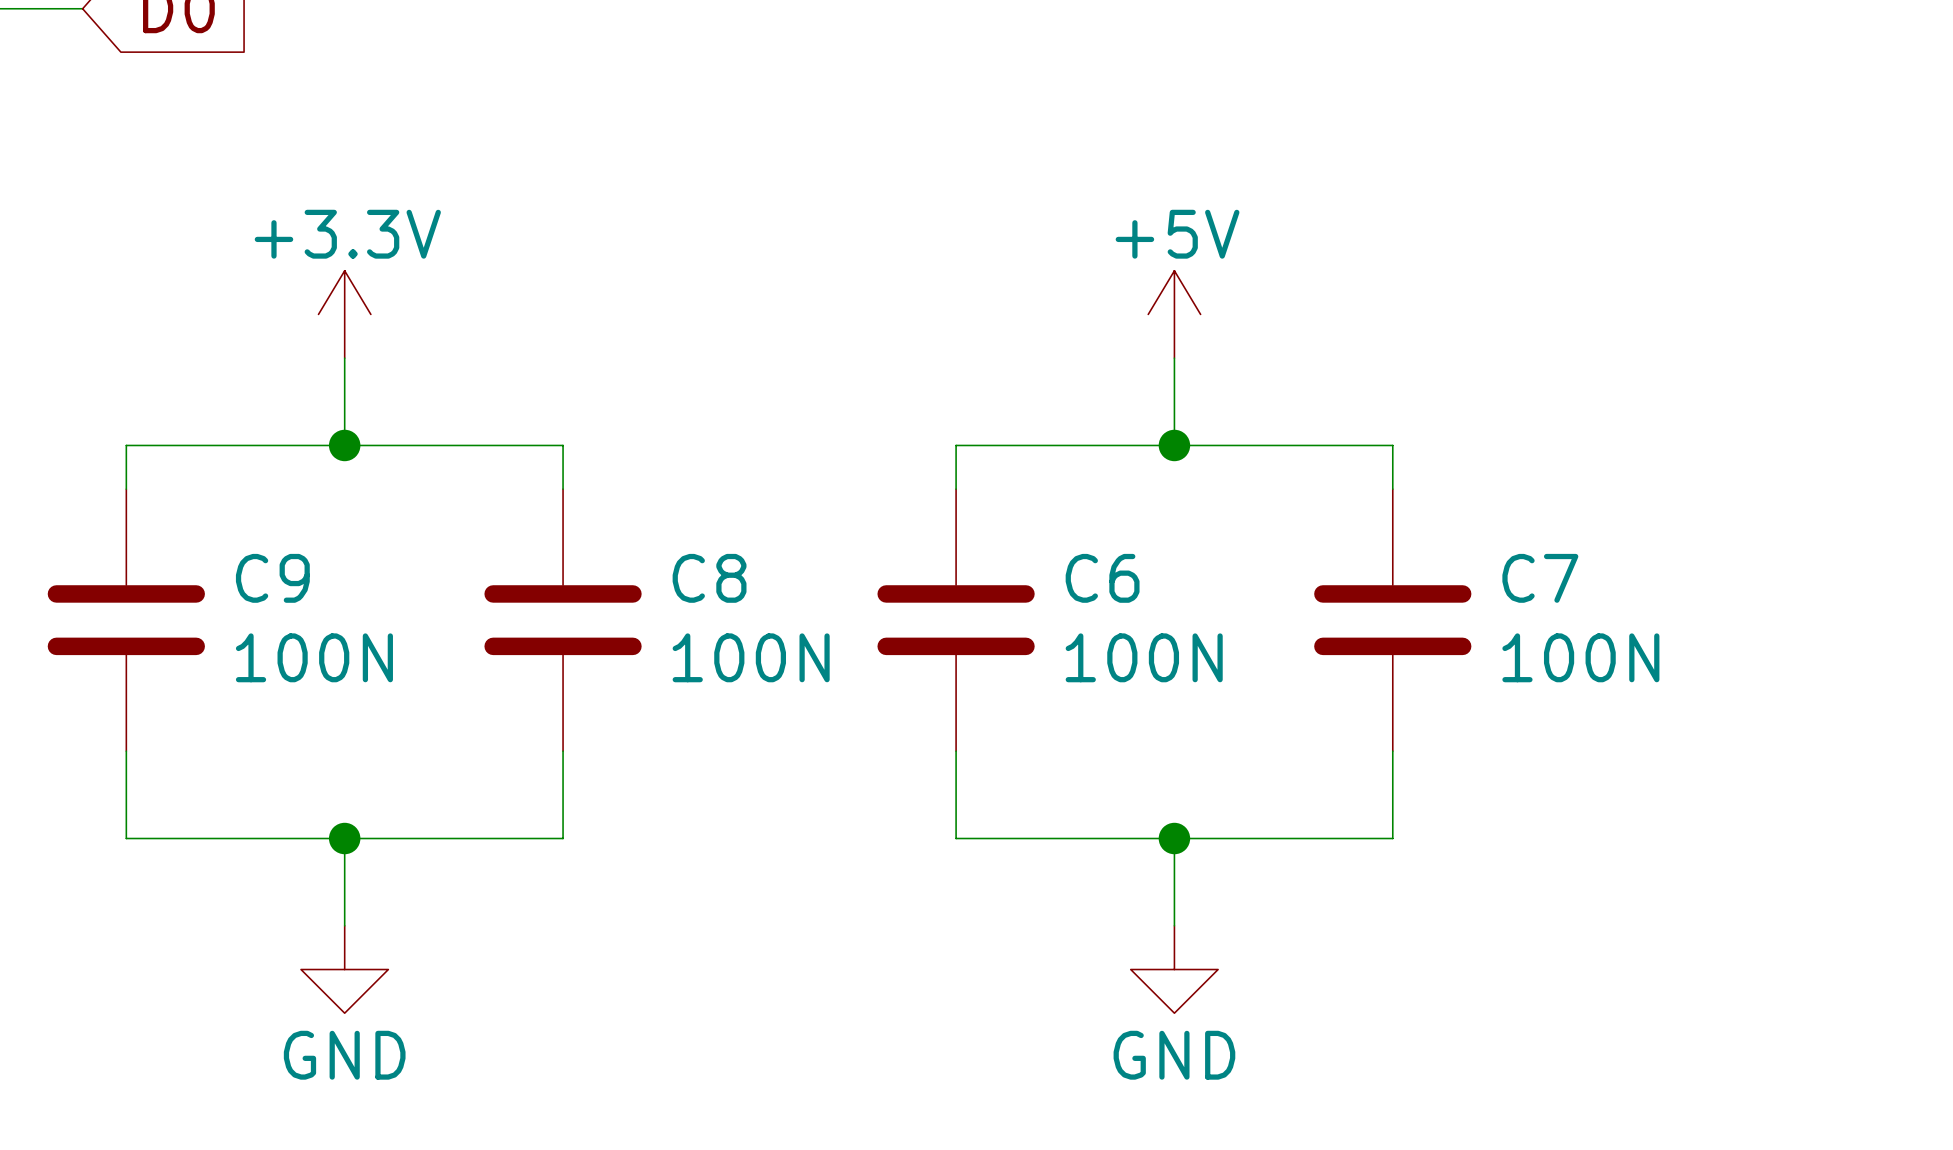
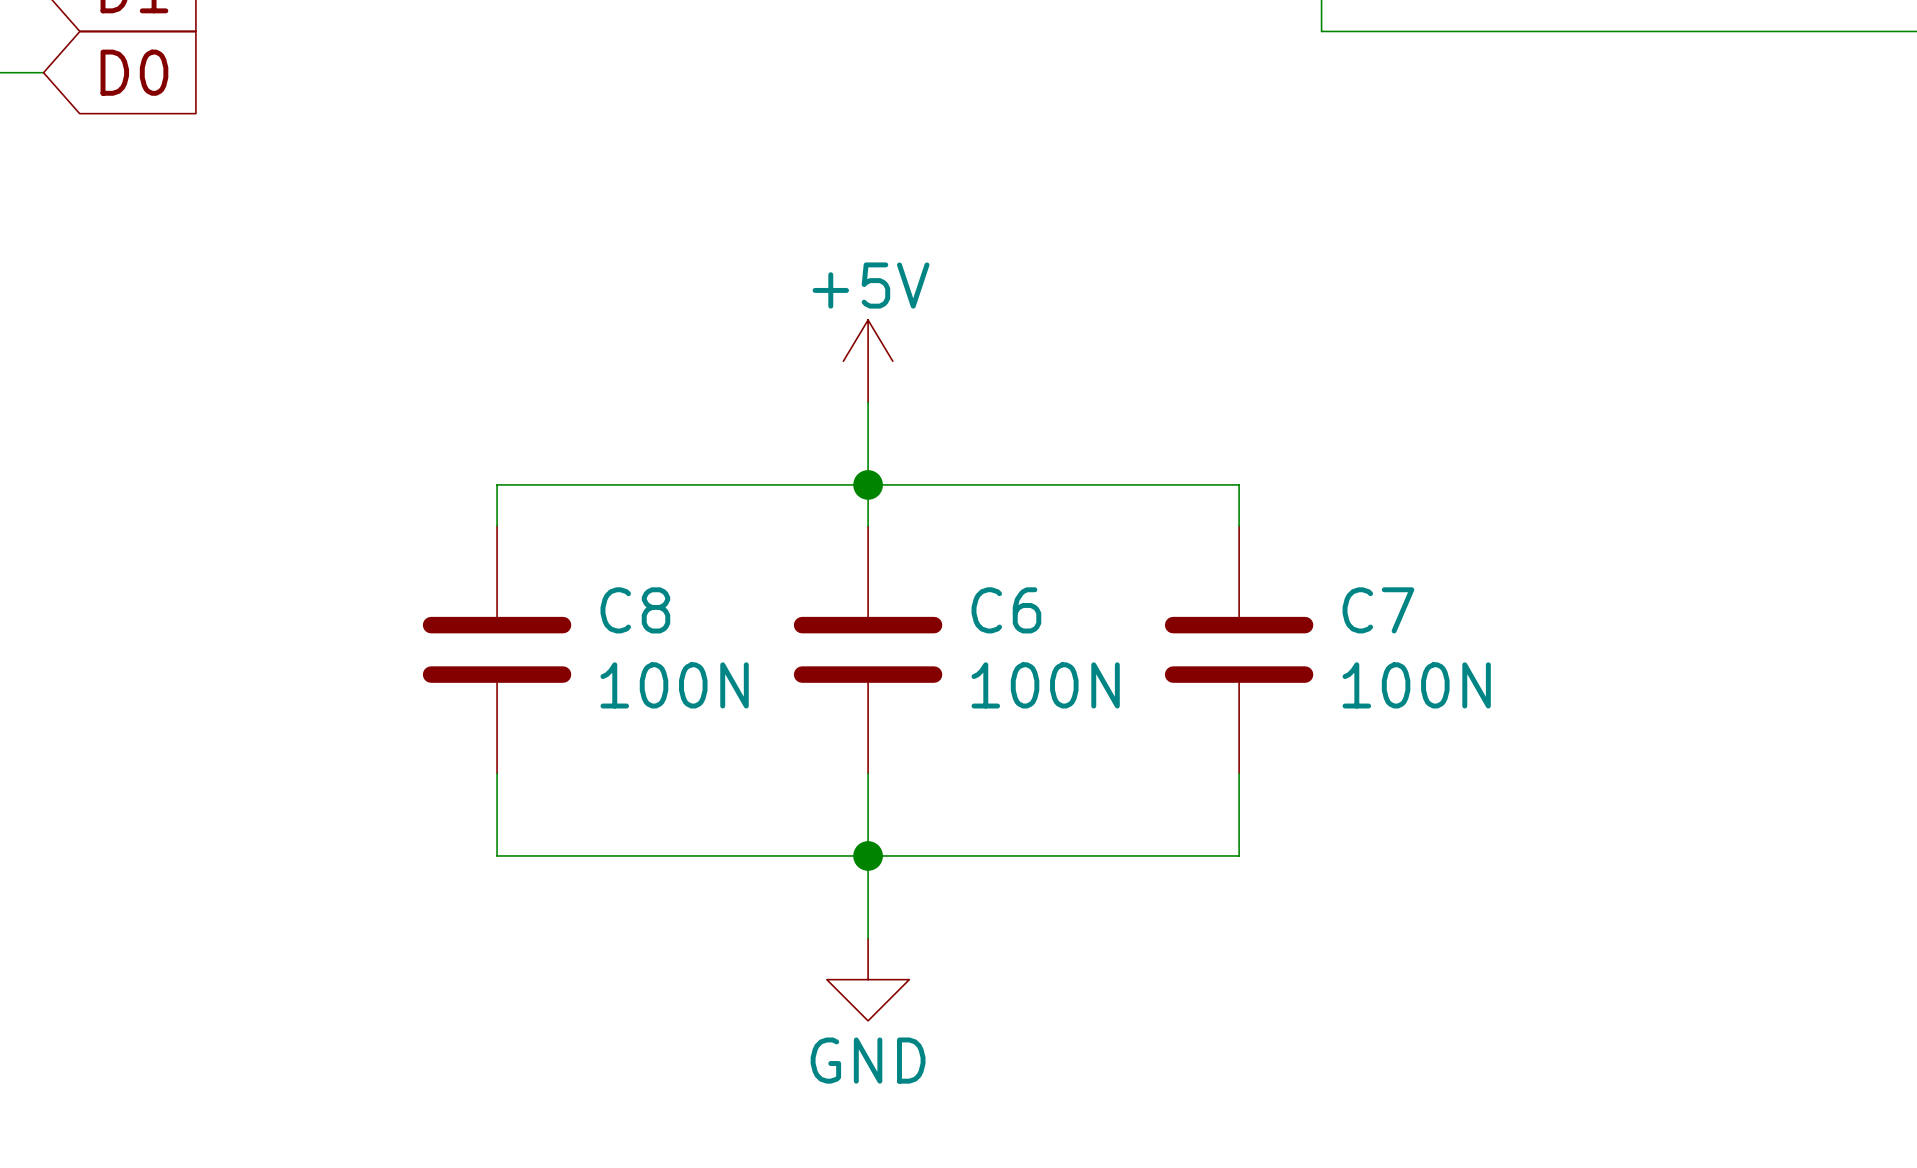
power symbol: +3.3V (344, 314) -> none
power symbol position: +5V (1174, 314) -> +5V (868, 361)
wire: (344, 358) (344, 445) -> none
wire: (1174, 358) (1174, 445) -> none
junction: (344, 445) -> none
wire: (563, 445) (126, 445) (126, 489) -> (497, 484) (868, 484) (868, 402)
junction: none -> (868, 484)
junction: (1174, 445) -> none
wire: (1349, 445) (1392, 445) (1392, 489) -> (1239, 484) (1239, 526)
C9: 100N (126, 620) -> none
C7 position: (1392, 620) -> (1239, 649)
wire: (126, 751) (126, 838) (563, 838) -> (868, 938) (868, 855) (497, 855)
wire: (1392, 751) (1392, 838) (1349, 838) -> (1239, 773) (1239, 855)
wire: (344, 838) (344, 925) -> none
junction: (344, 838) -> none
junction: none -> (868, 855)
wire: (1174, 838) (1174, 925) -> none
junction: (1174, 838) -> none
power symbol: GND (344, 969) -> none
power symbol position: GND (1174, 969) -> GND (868, 979)

